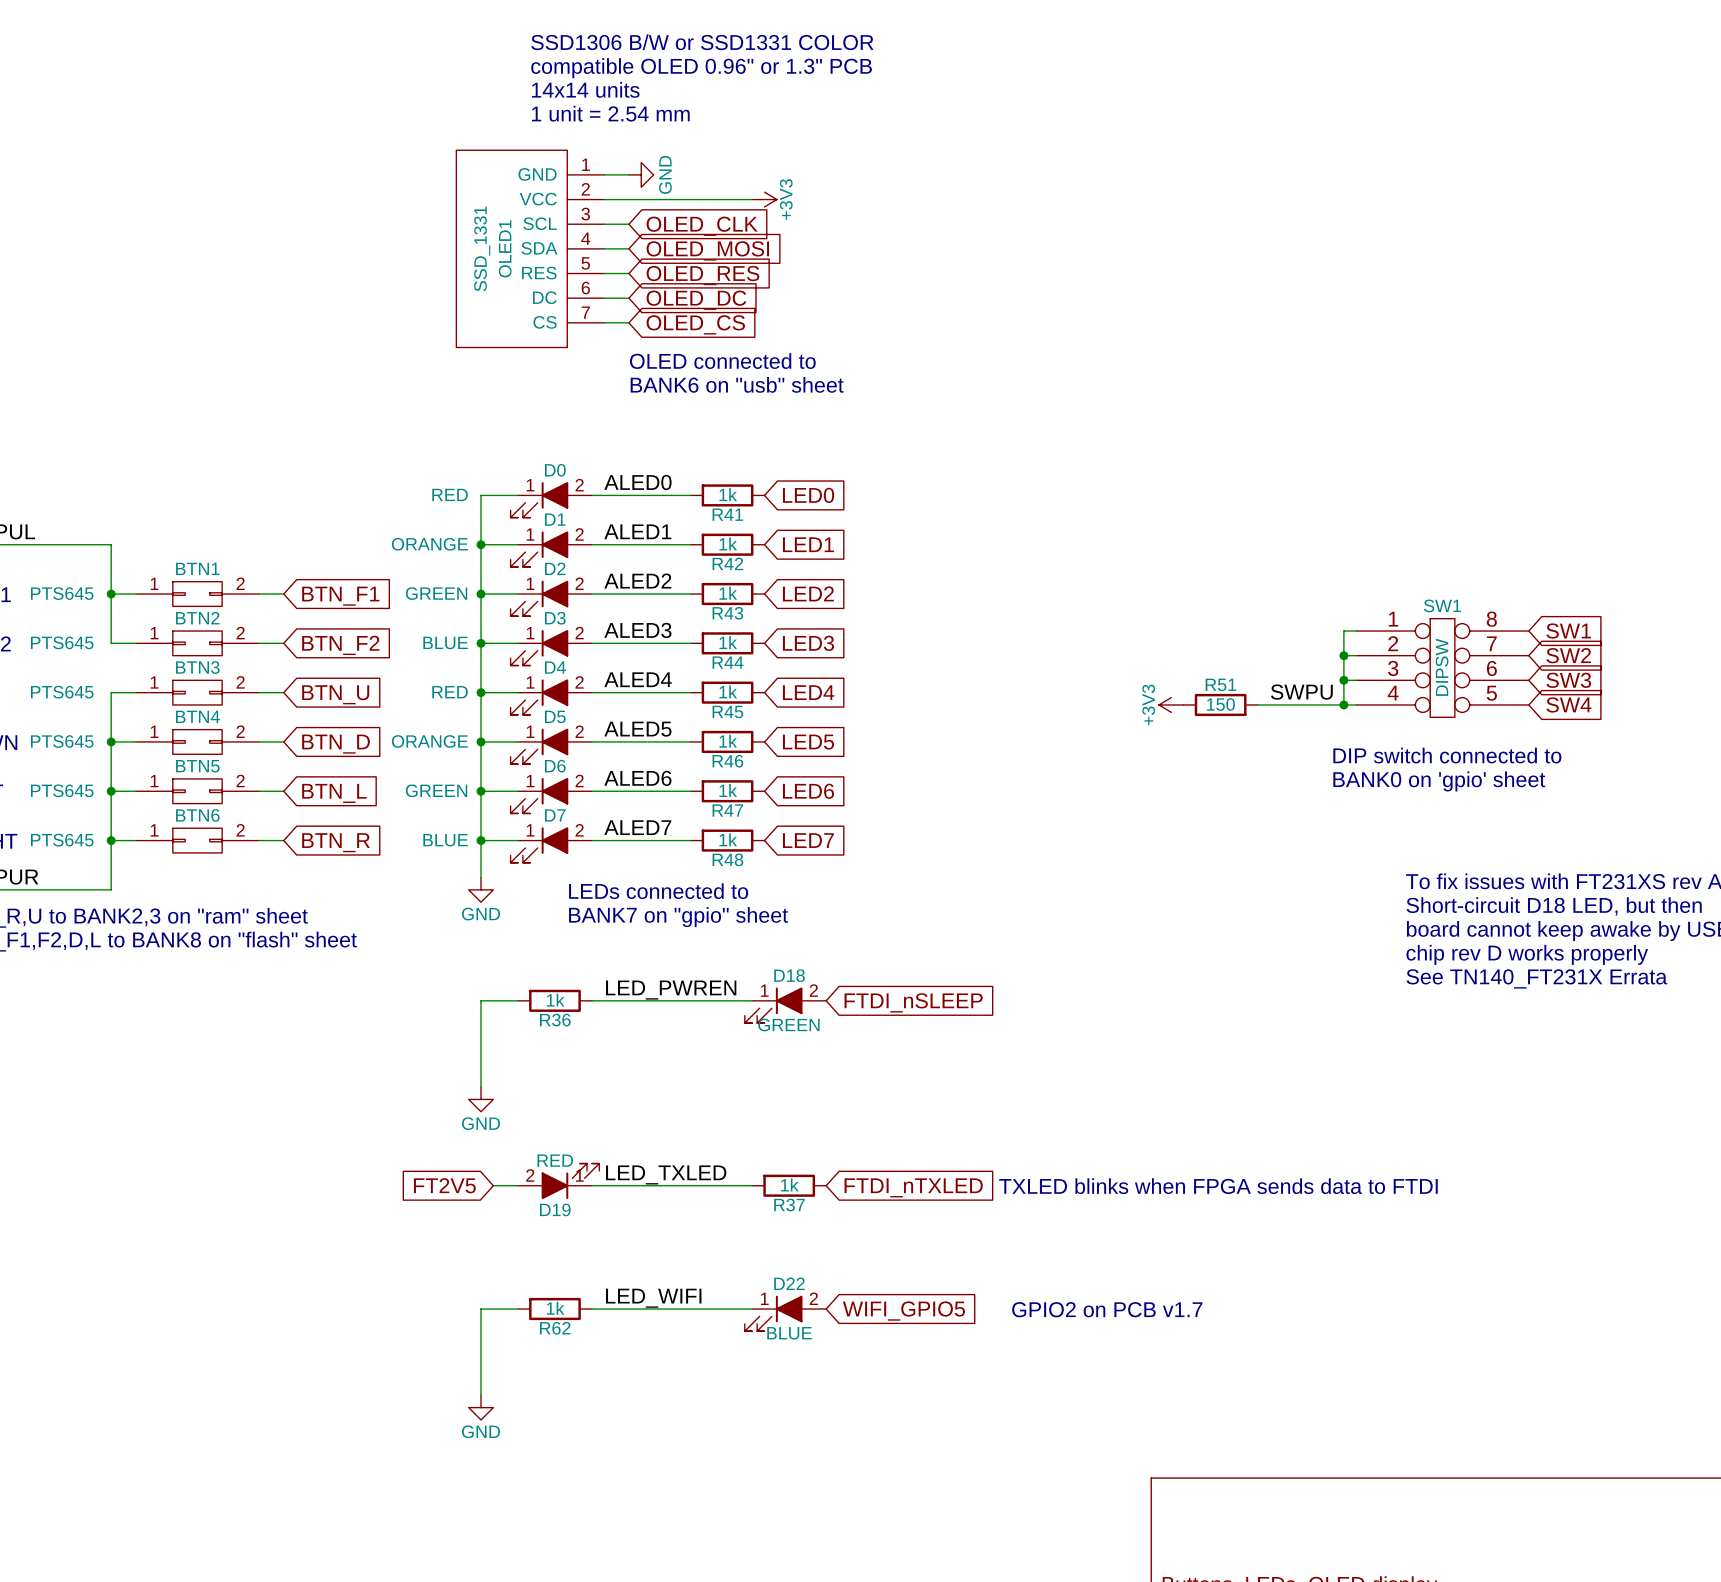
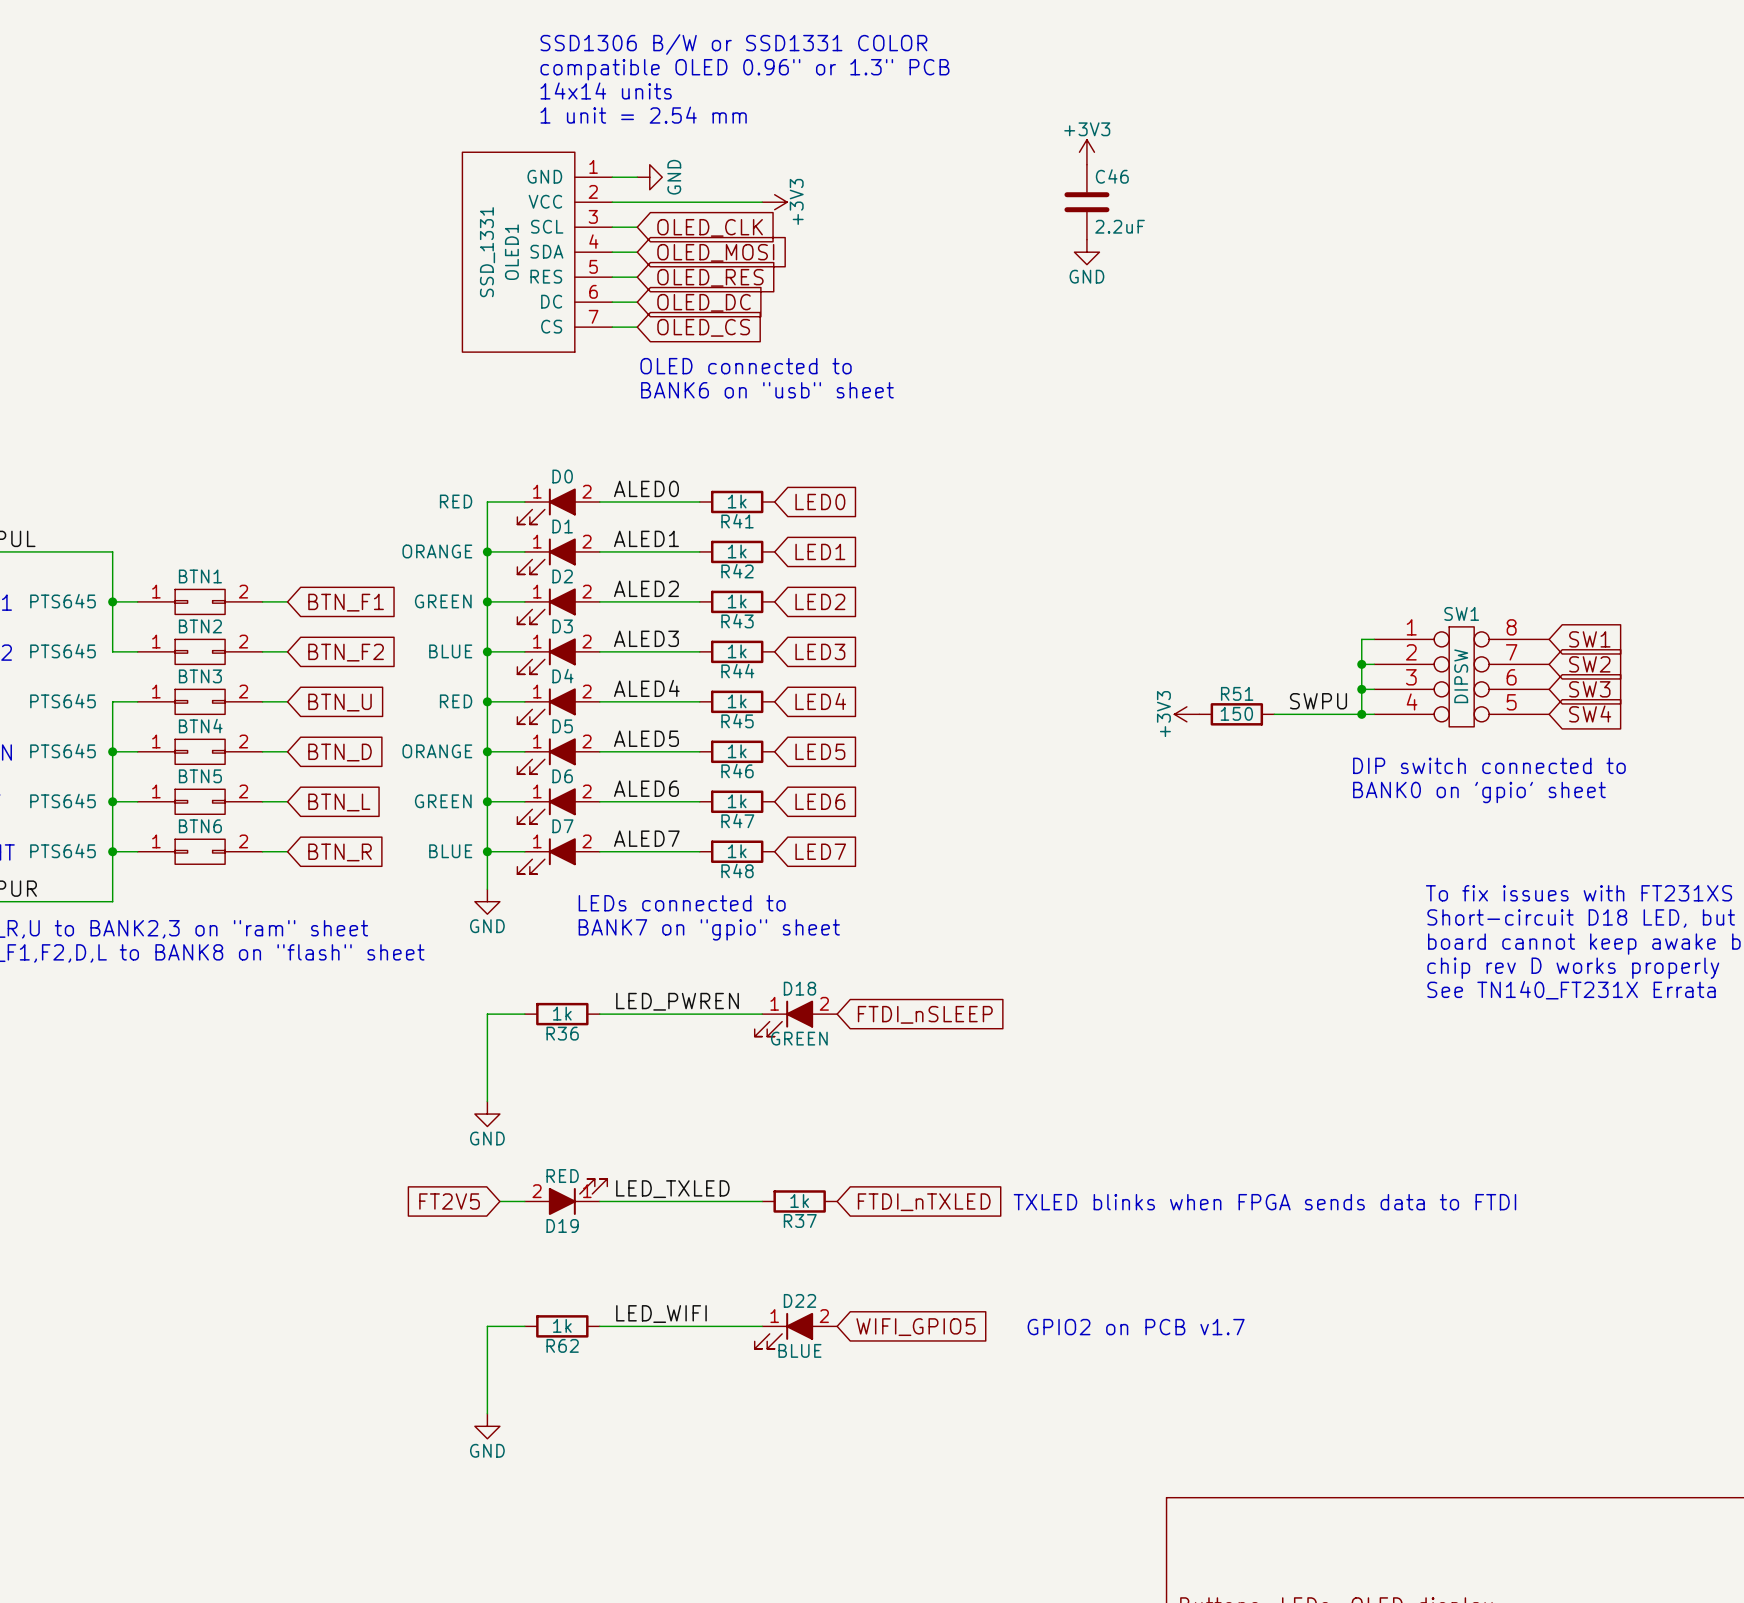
power symbol: none -> +3V3 (1086, 152)
C46: none -> 2.2uF (1086, 202)
power symbol: none -> GND (1086, 252)

